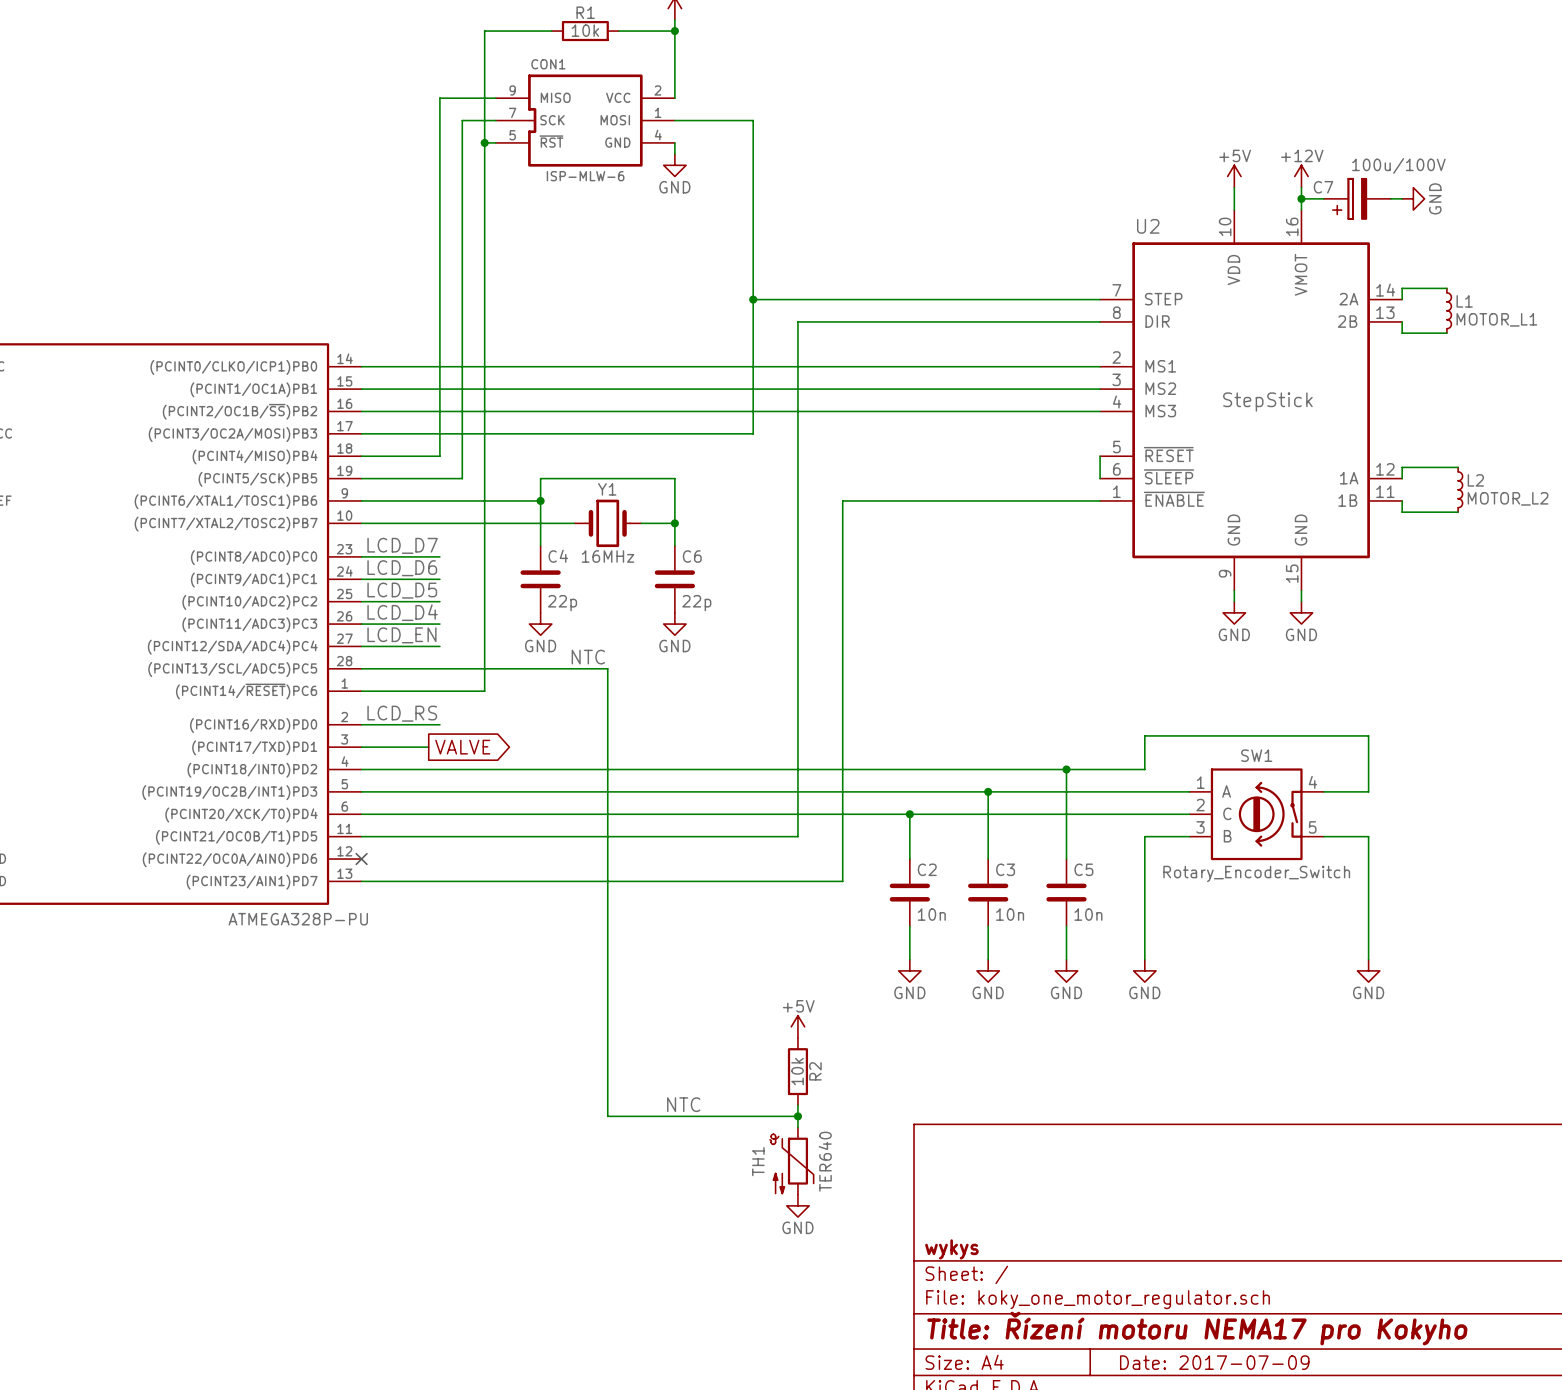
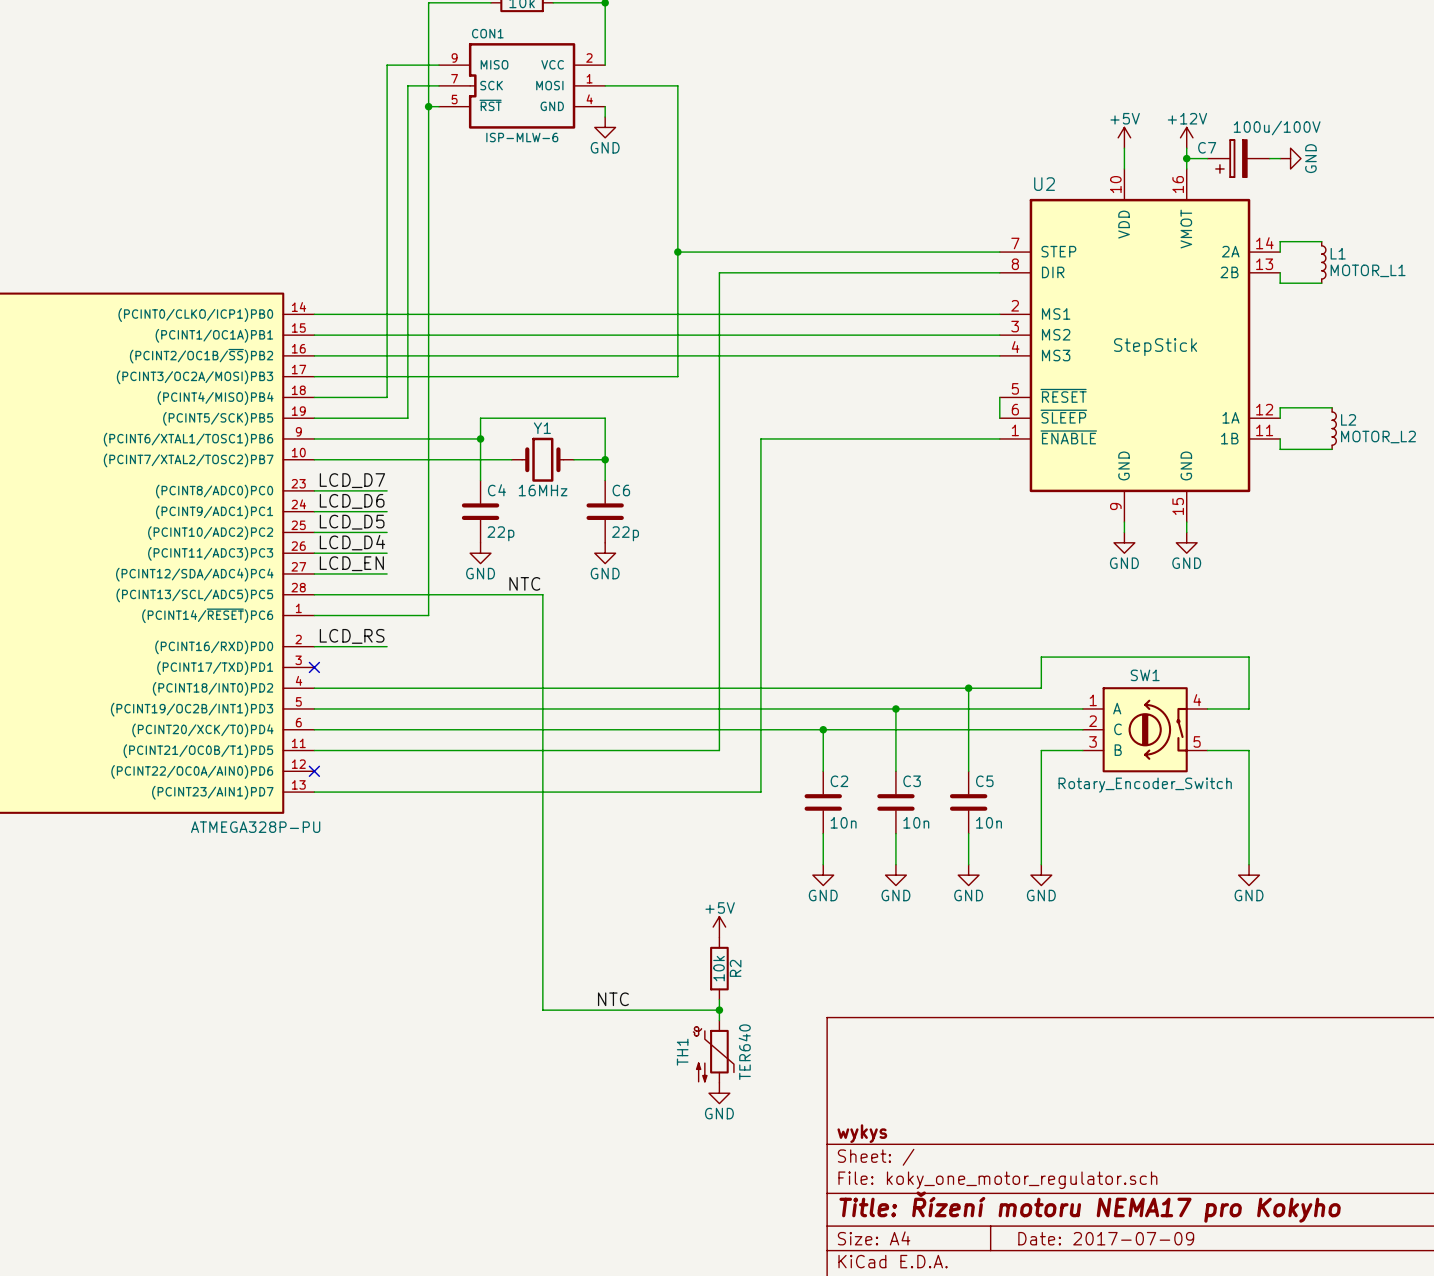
wire: (361, 747) (428, 747) -> none
no-connect mark: none -> (314, 667)
global label: VALVE (462, 747) -> none

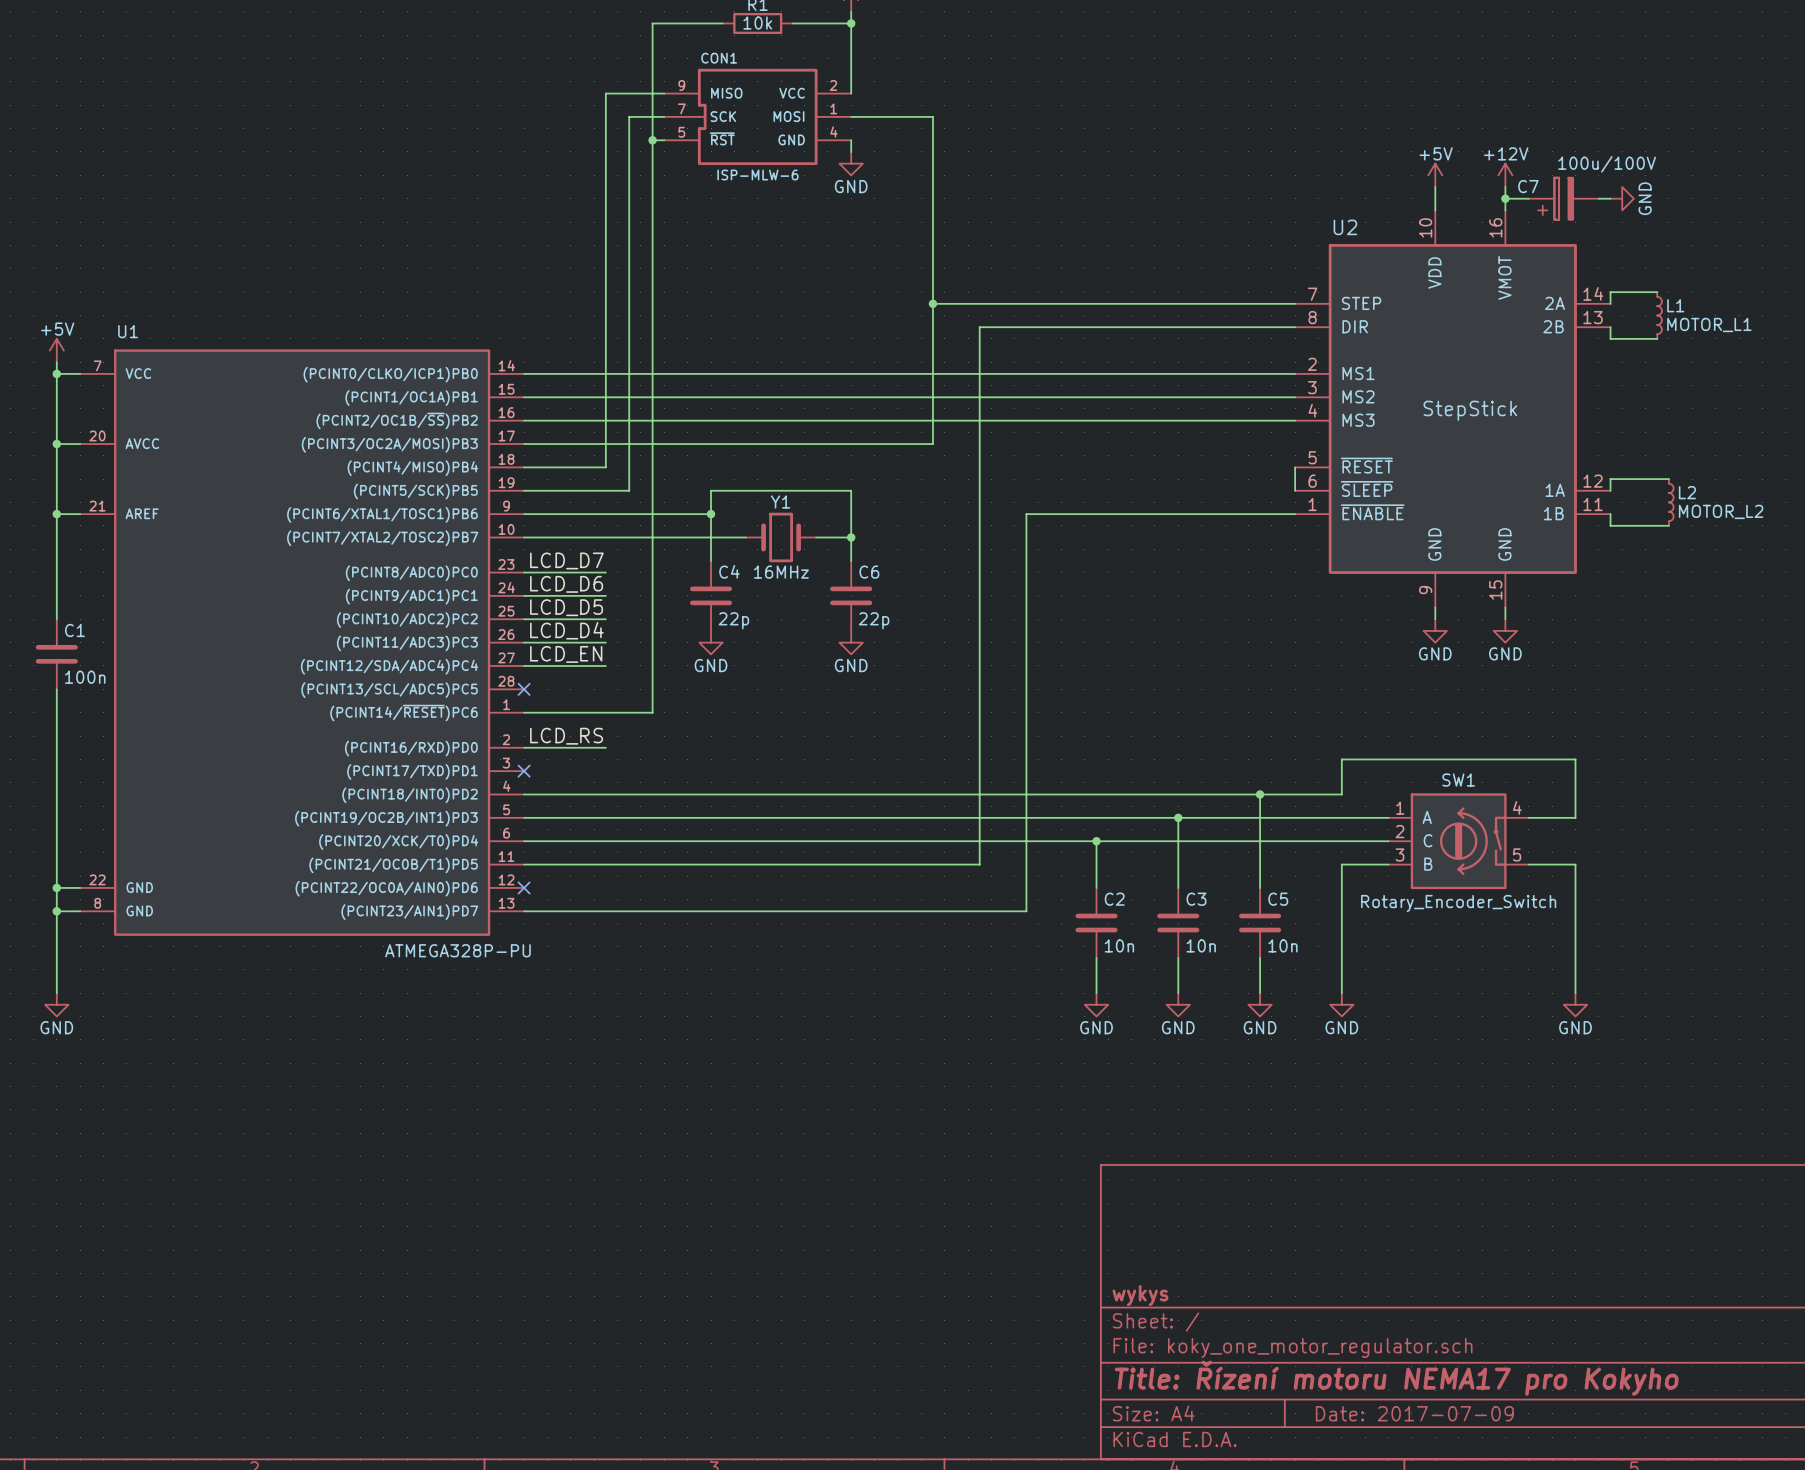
label: NTC (524, 583) -> none
wire: (314, 594) (542, 594) (542, 1010) (719, 1010) -> none
no-connect mark: none -> (524, 689)
power symbol: +5V (719, 927) -> none
R2: 10k (719, 968) -> none
label: NTC (613, 999) -> none
wire: (719, 999) (719, 1020) -> none
junction: (719, 1010) -> none
TH1: TER640 (713, 1051) -> none
power symbol: GND (719, 1093) -> none

